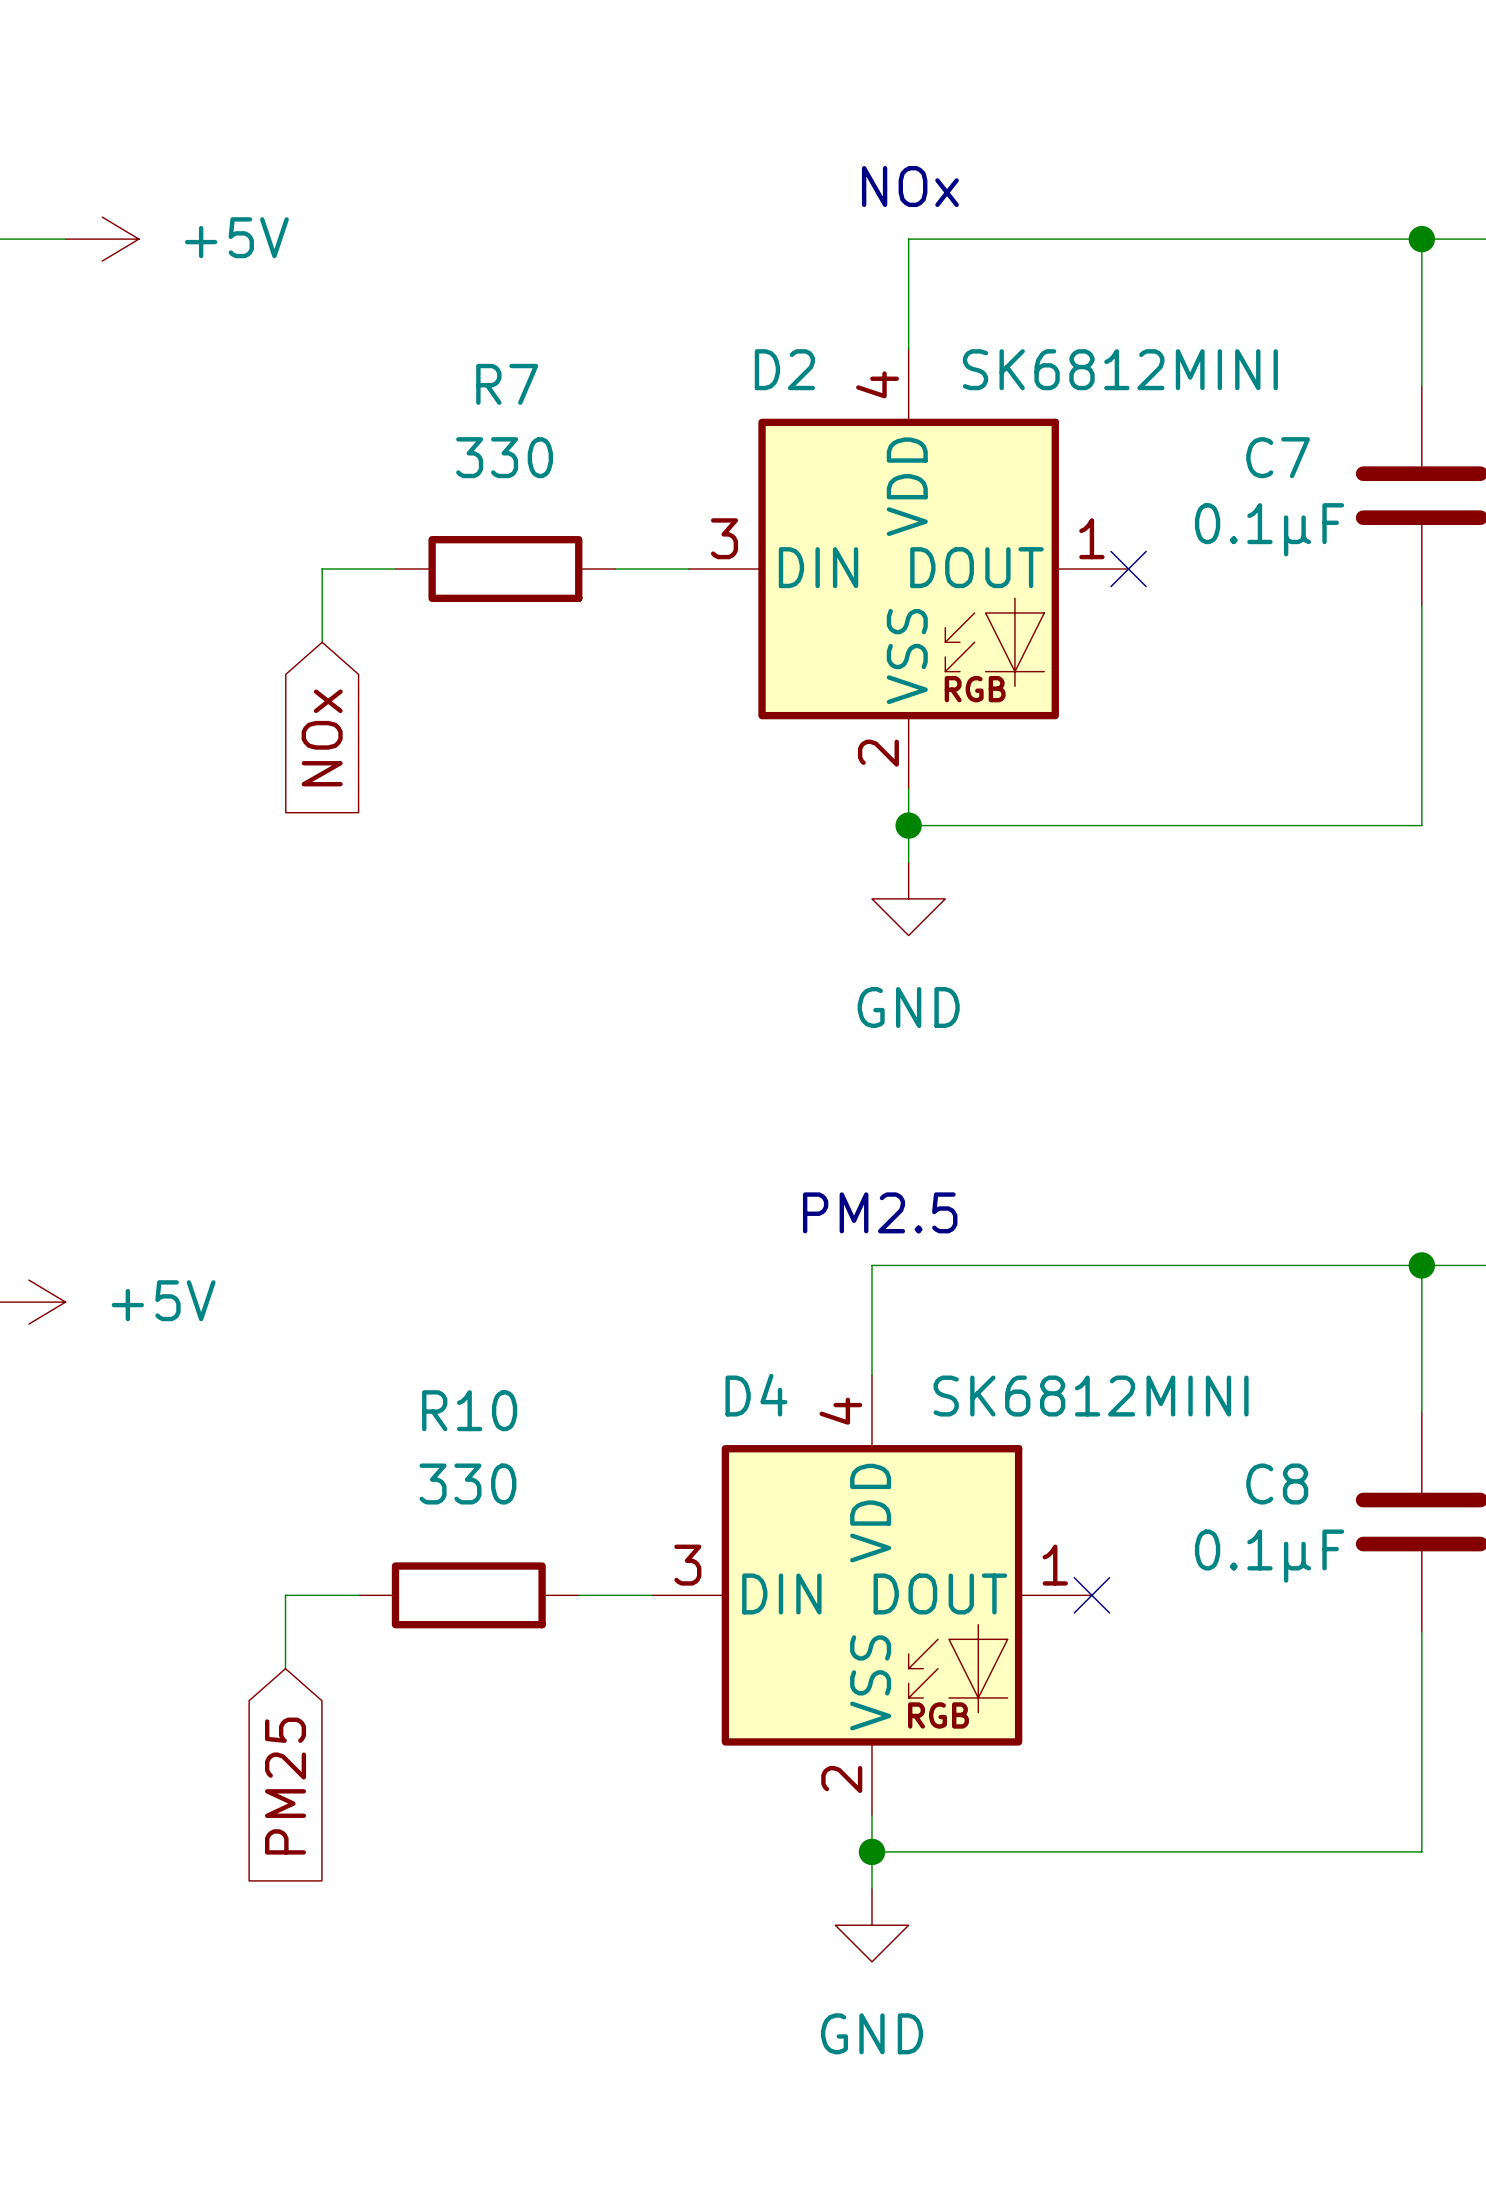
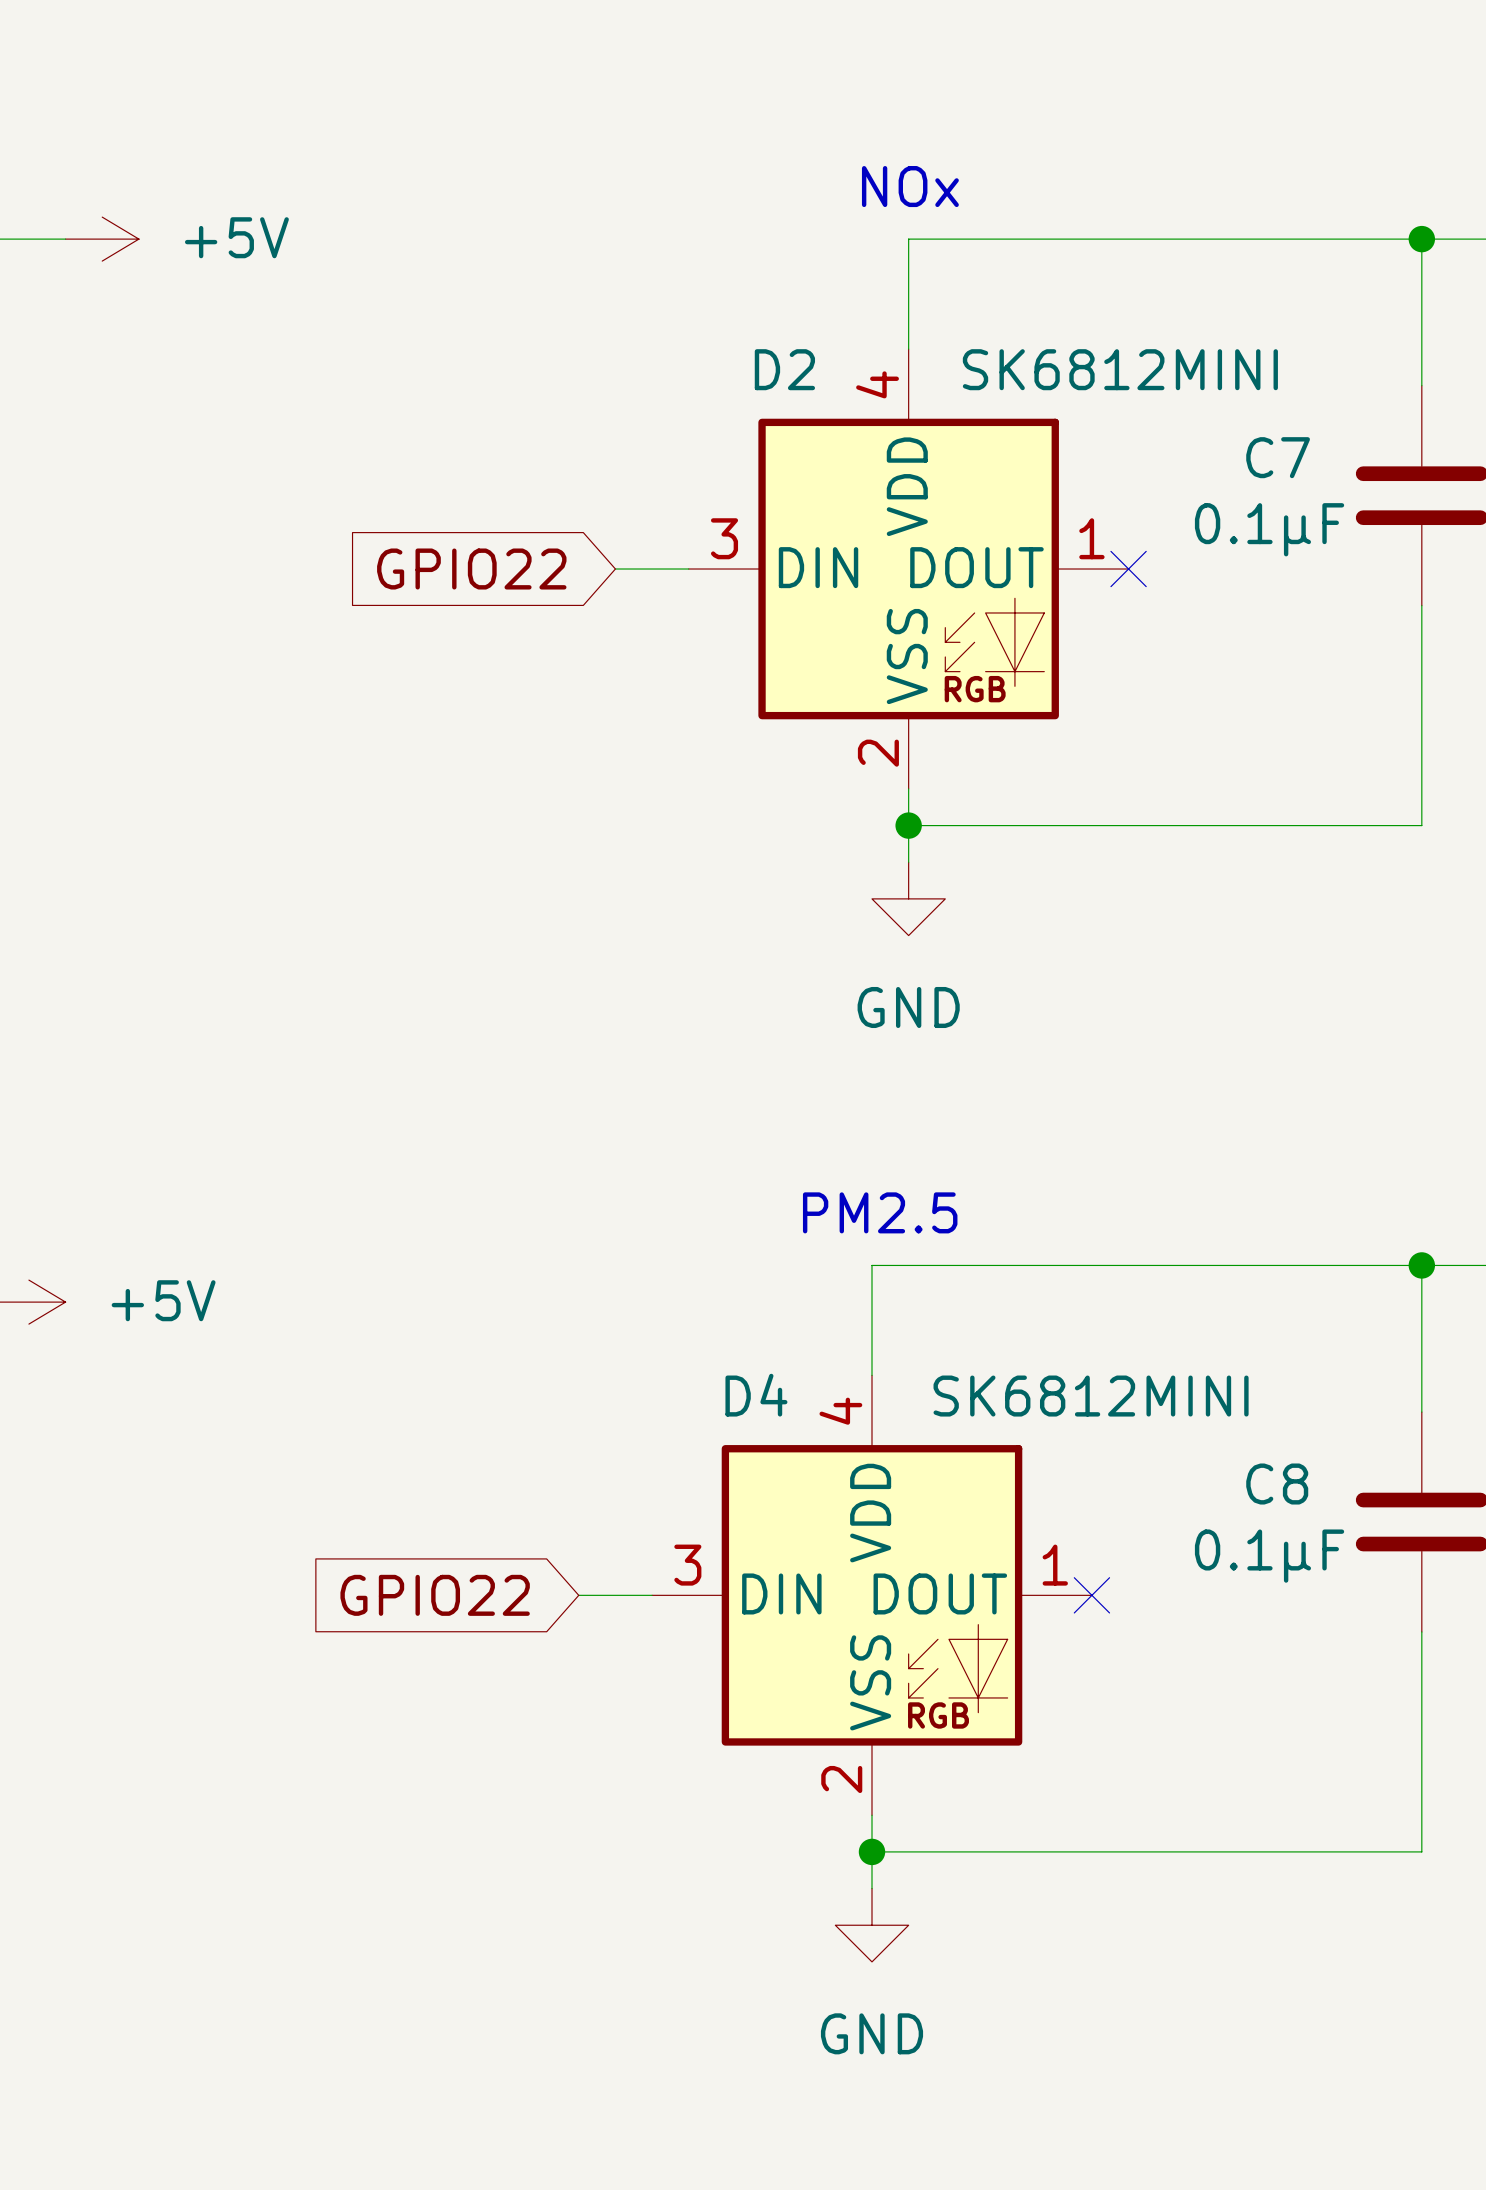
wire: (395, 569) (322, 569) (322, 642) -> none
global label: none -> GPIO22 (471, 569)
R7: 330 (505, 569) -> none
global label: NOx (322, 737) -> none
wire: (358, 1595) (285, 1595) (285, 1668) -> none
global label: none -> GPIO22 (435, 1595)
R10: 330 (468, 1595) -> none
global label: PM25 (285, 1786) -> none

